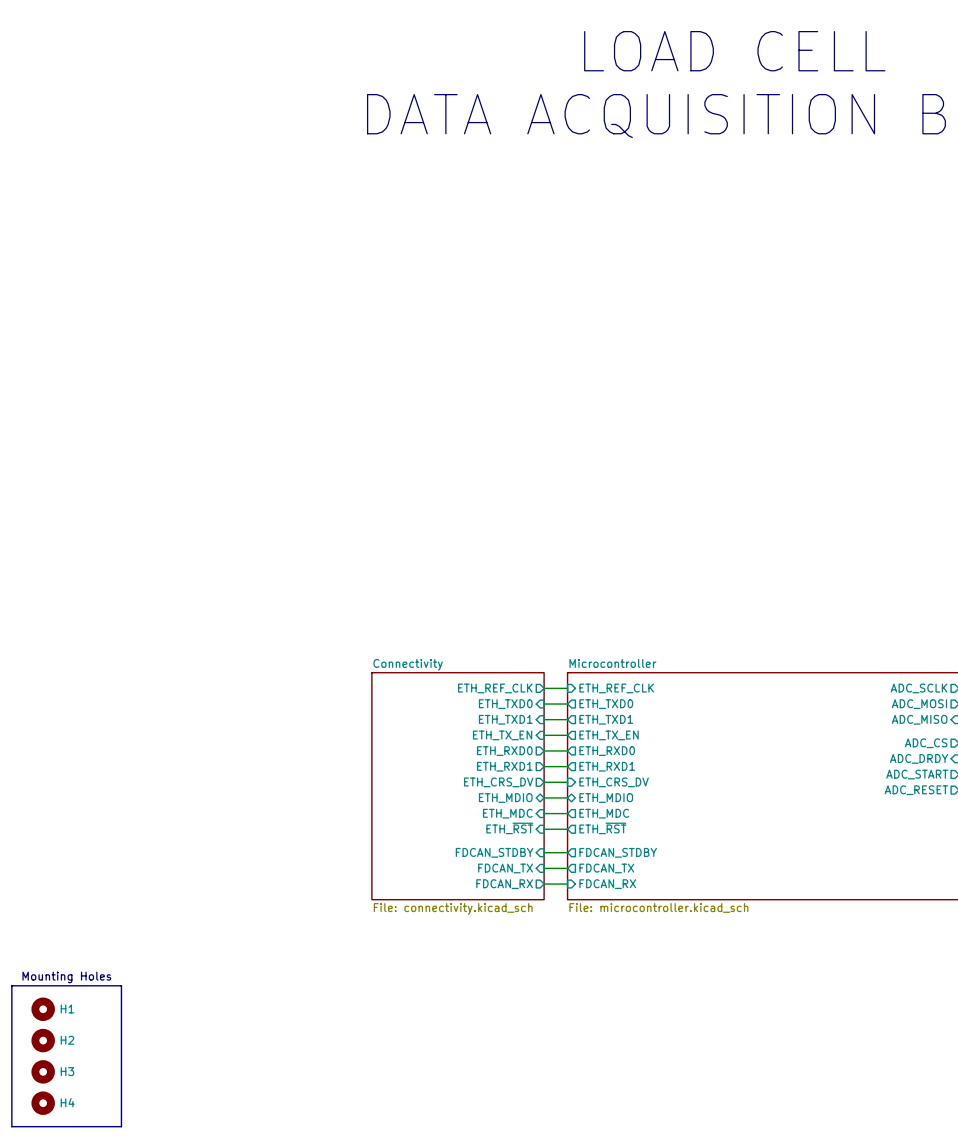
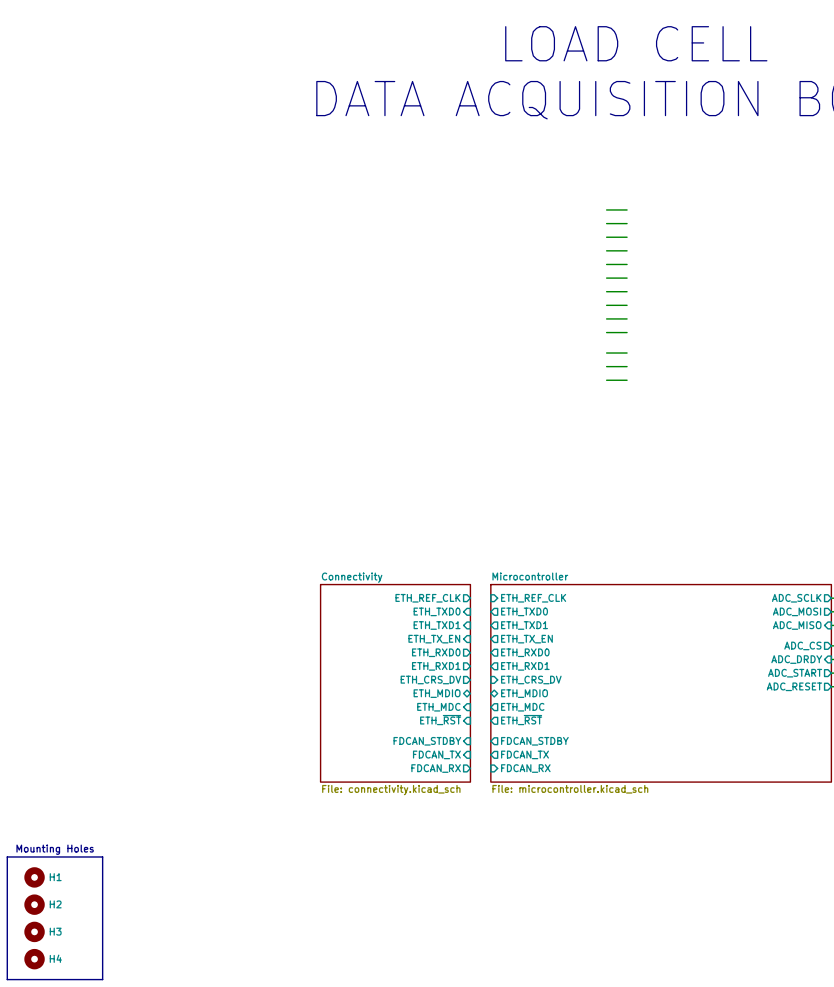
wire: none -> (606, 209) (627, 209)
wire: none -> (606, 223) (627, 223)
wire: none -> (606, 237) (627, 237)
wire: none -> (606, 250) (627, 250)
wire: none -> (606, 264) (627, 264)
wire: none -> (606, 278) (627, 278)
wire: none -> (606, 291) (627, 291)
wire: none -> (606, 305) (627, 305)
wire: none -> (606, 318) (627, 318)
wire: none -> (606, 332) (627, 332)
wire: none -> (606, 353) (627, 353)
wire: none -> (606, 366) (627, 366)
wire: none -> (606, 380) (627, 380)
wire: (544, 688) (567, 688) -> none
wire: (544, 704) (567, 704) -> none
wire: (544, 719) (567, 719) -> none
wire: (544, 735) (567, 735) -> none
wire: (544, 750) (567, 750) -> none
wire: (544, 766) (567, 766) -> none
wire: (544, 782) (567, 782) -> none
wire: (544, 797) (567, 797) -> none
wire: (544, 813) (567, 813) -> none
wire: (544, 829) (567, 829) -> none
wire: (544, 852) (567, 852) -> none
wire: (544, 868) (567, 868) -> none
wire: (544, 884) (567, 884) -> none

